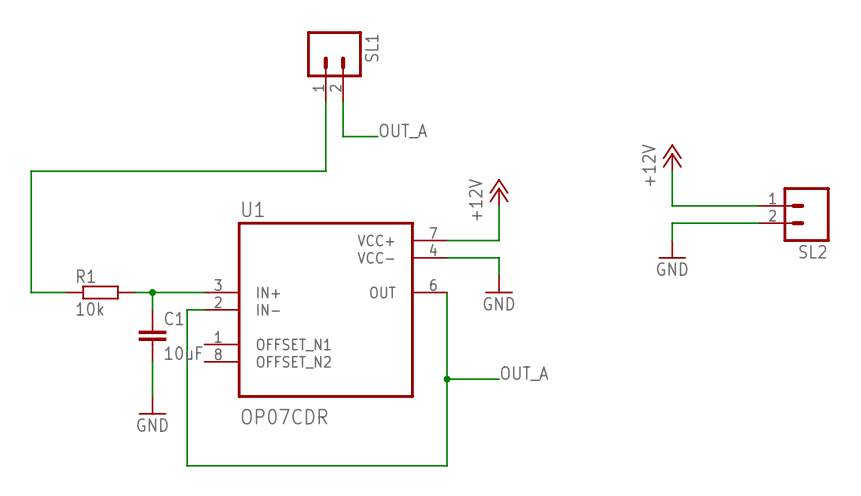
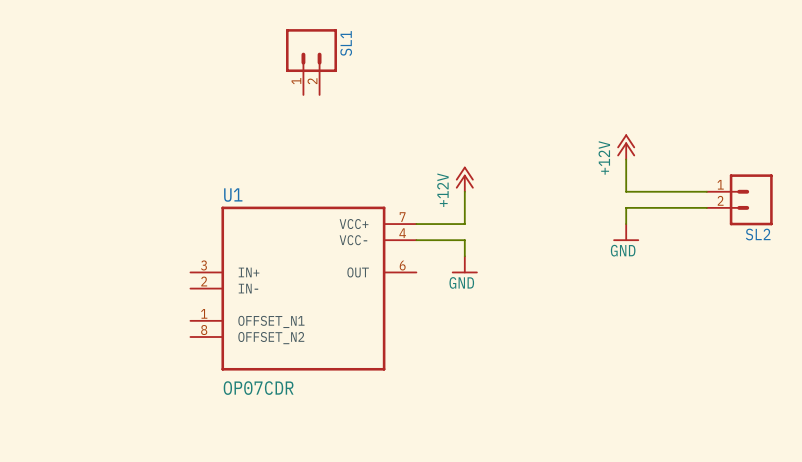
wire: (325, 101) (325, 171) (31, 171) (31, 292) (65, 292) -> none
wire: (343, 101) (343, 136) (377, 136) -> none
label: OUT_A (403, 131) -> none
R1: 10k (100, 292) -> none
wire: (135, 292) (204, 292) -> none
wire: (152, 292) (152, 309) -> none
junction: (152, 292) -> none
wire: (447, 292) (447, 465) (187, 465) (187, 309) (204, 309) -> none
C1: 10uF (152, 335) -> none
wire: (152, 361) (152, 396) -> none
label: OUT_A (524, 373) -> none
wire: (447, 379) (499, 379) -> none
junction: (447, 379) -> none
power symbol: GND (152, 405) -> none

